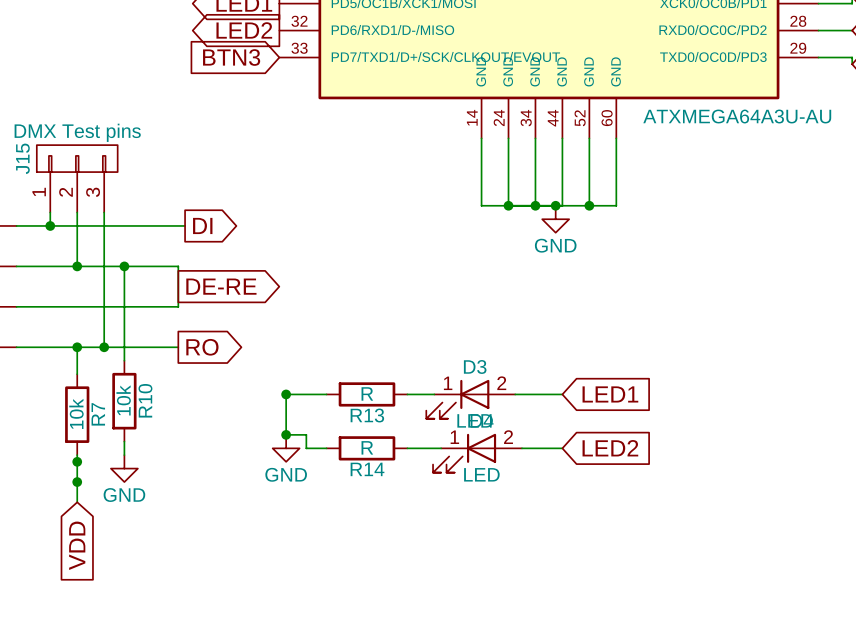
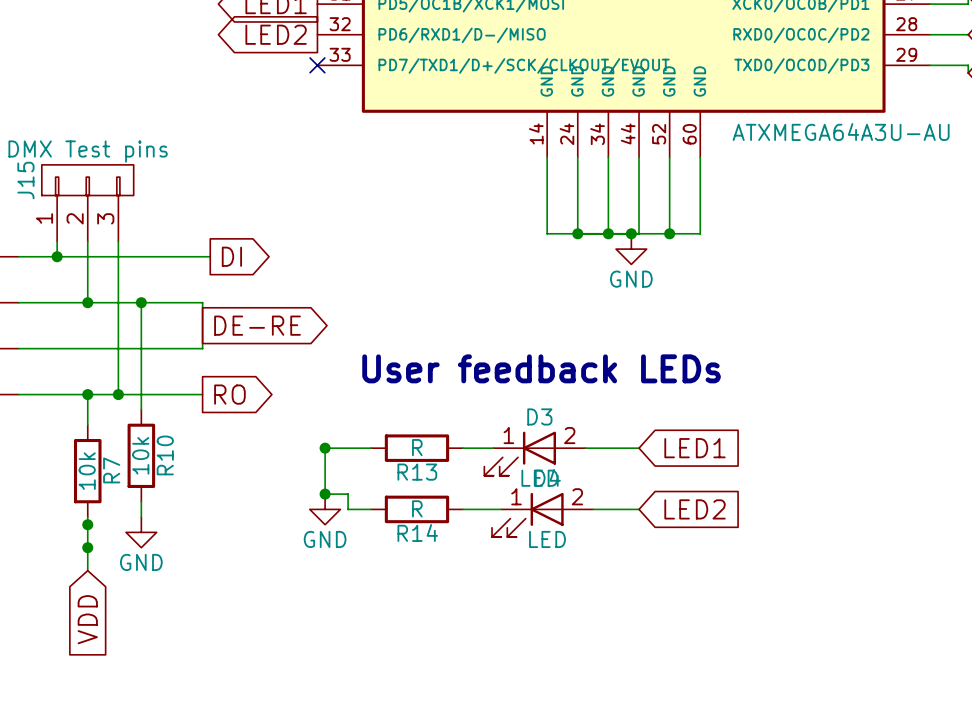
global label: BTN3 (231, 57) -> none
no-connect mark: none -> (317, 65)
text: none -> User feedback LEDs (541, 368)

